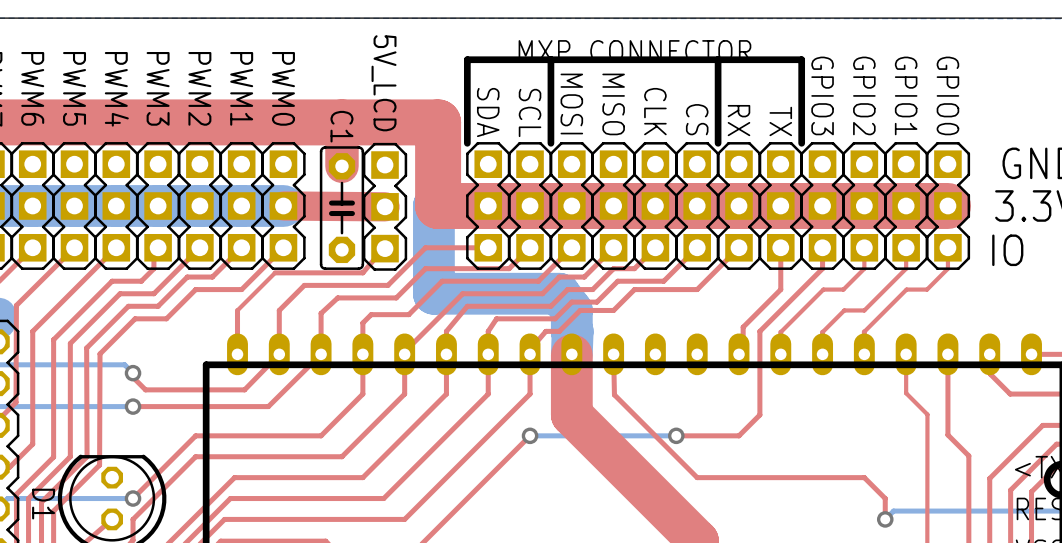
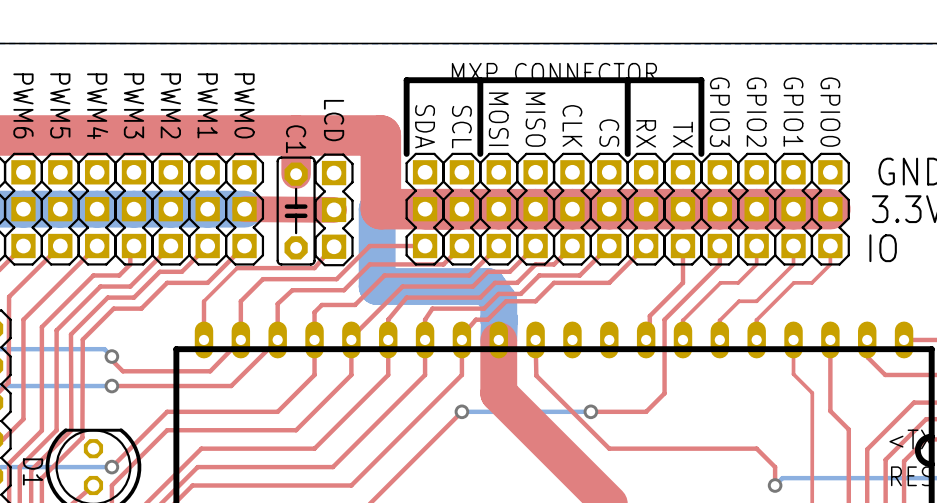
5V_LCD name: 5V_LCD (384, 83) -> LCD (334, 120)

